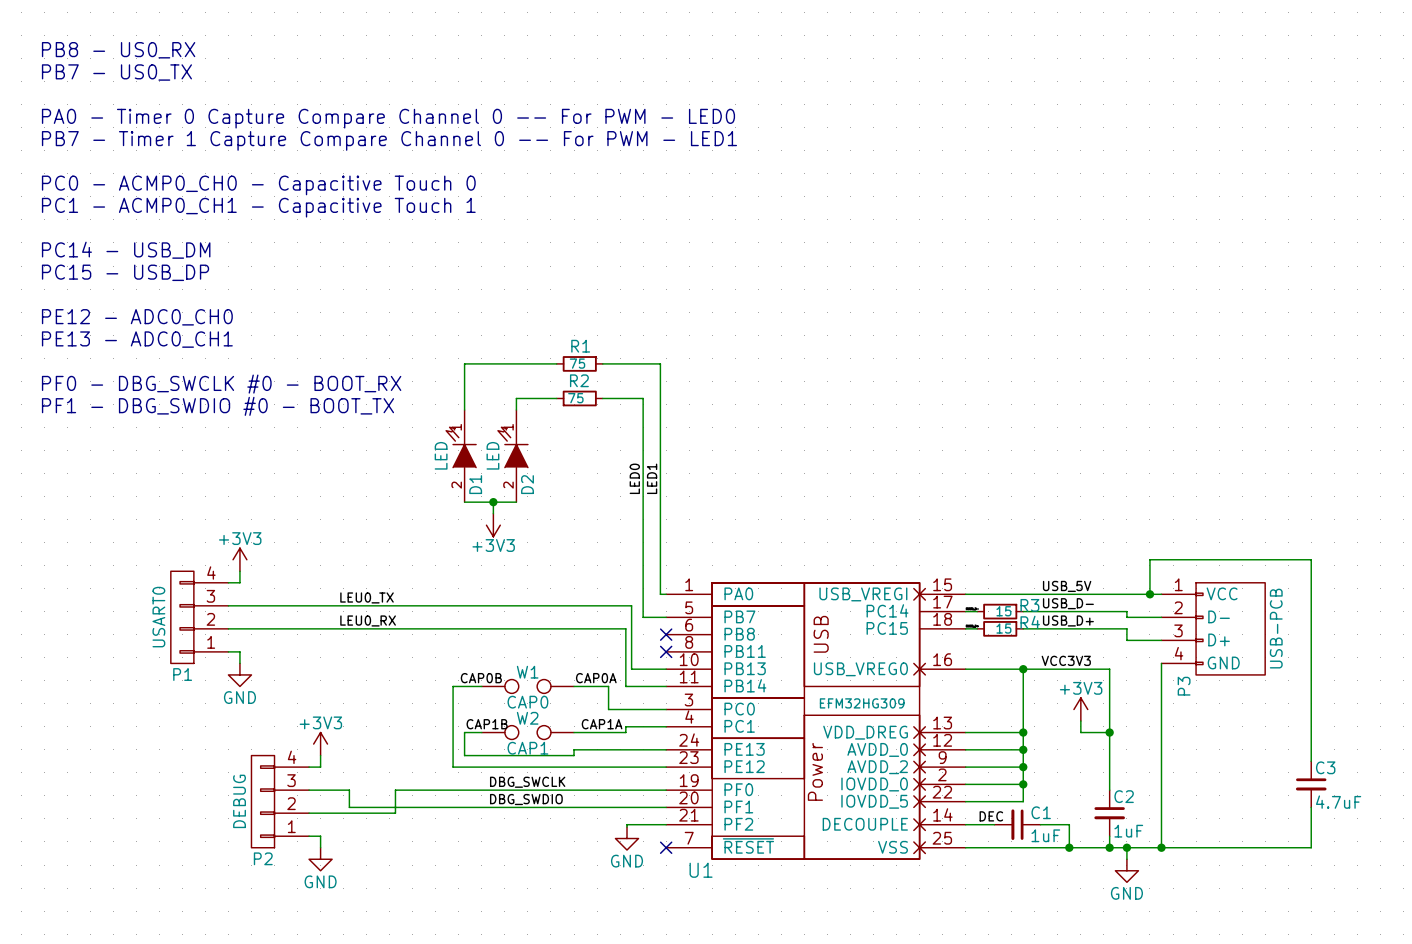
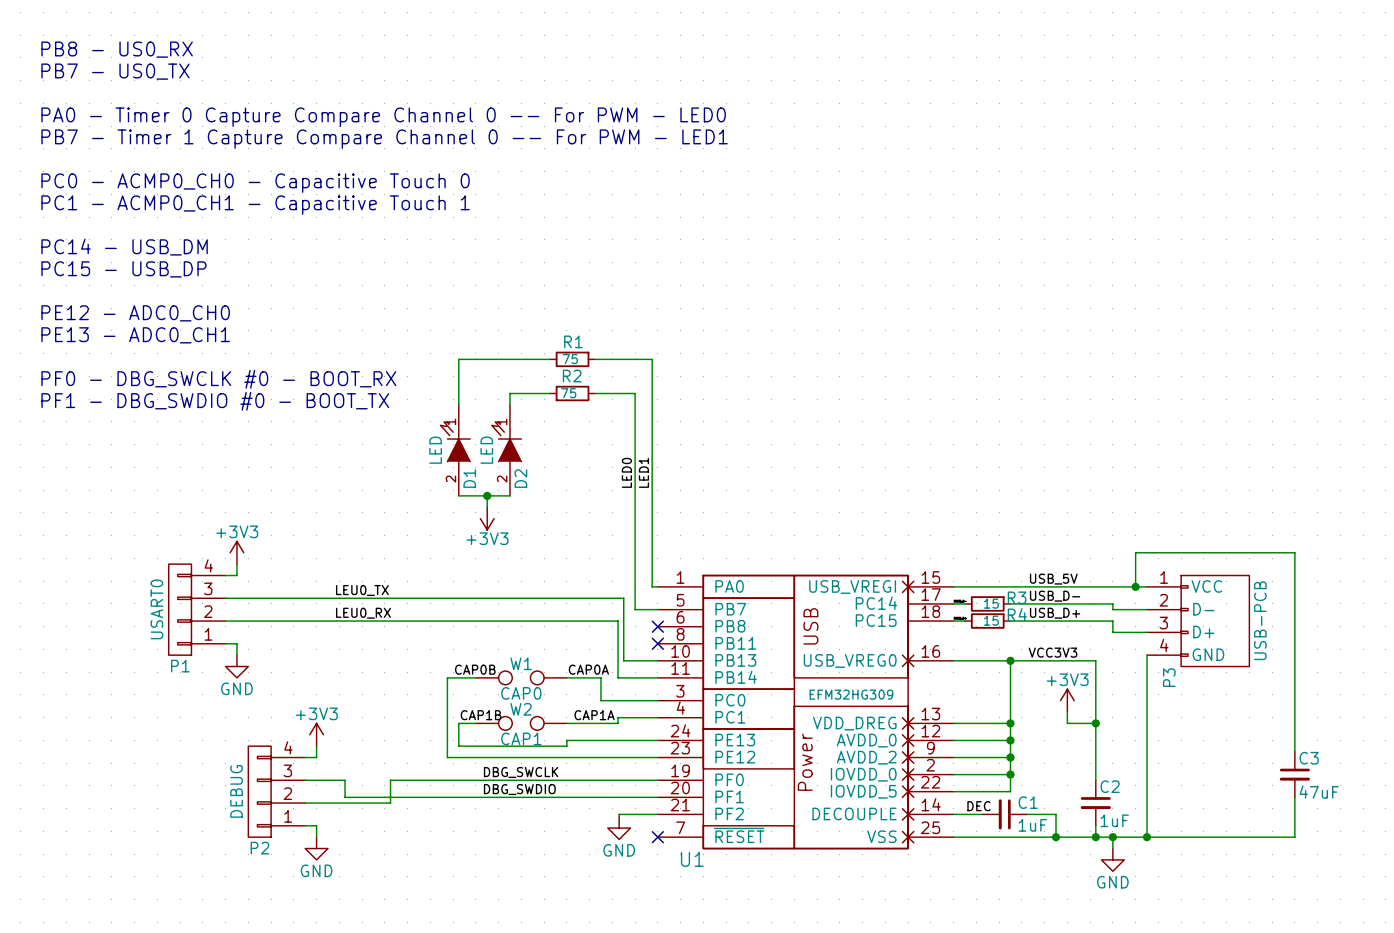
C3 value: 4.7uF (1338, 802) -> 47uF (1319, 792)

